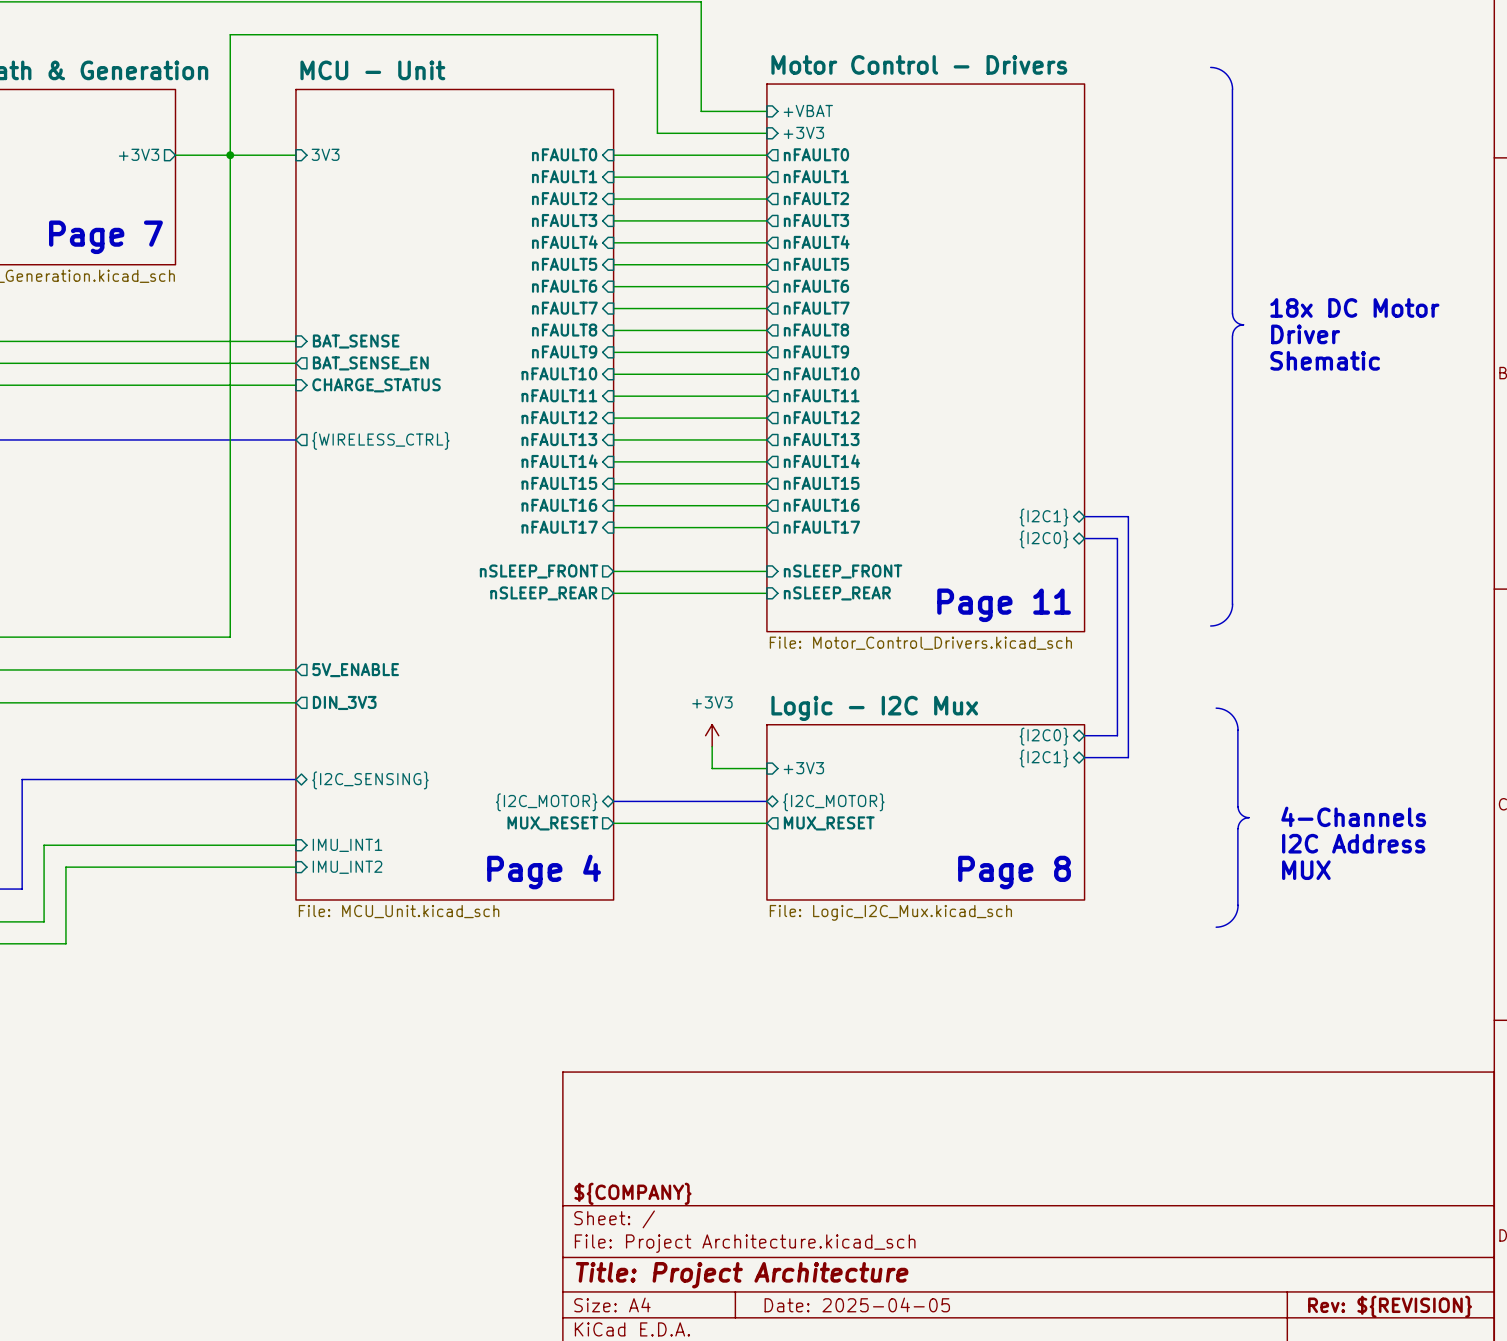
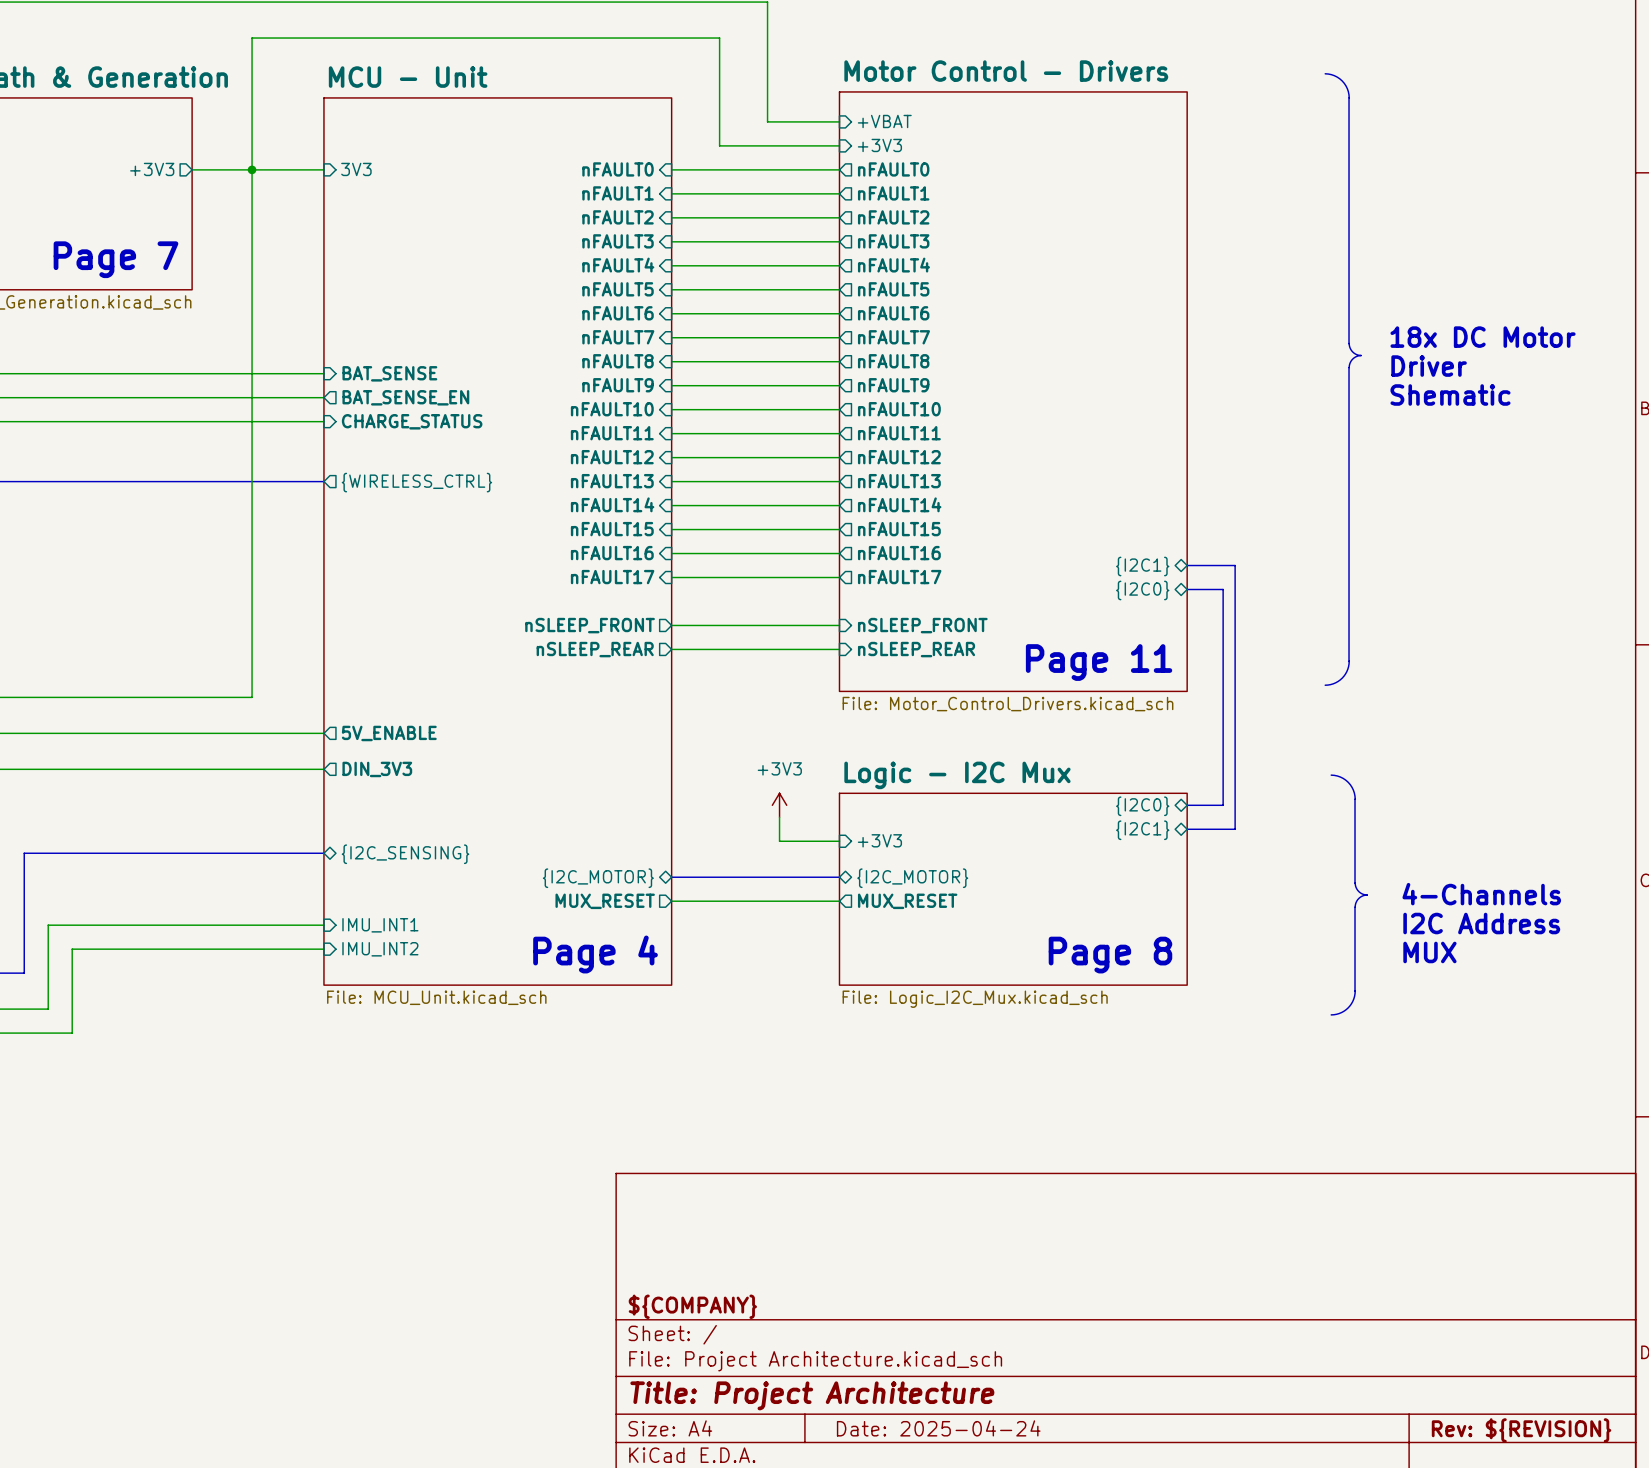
title block: Date: 2025-04-05 (857, 1304) -> Date: 2025-04-24 (938, 1428)

